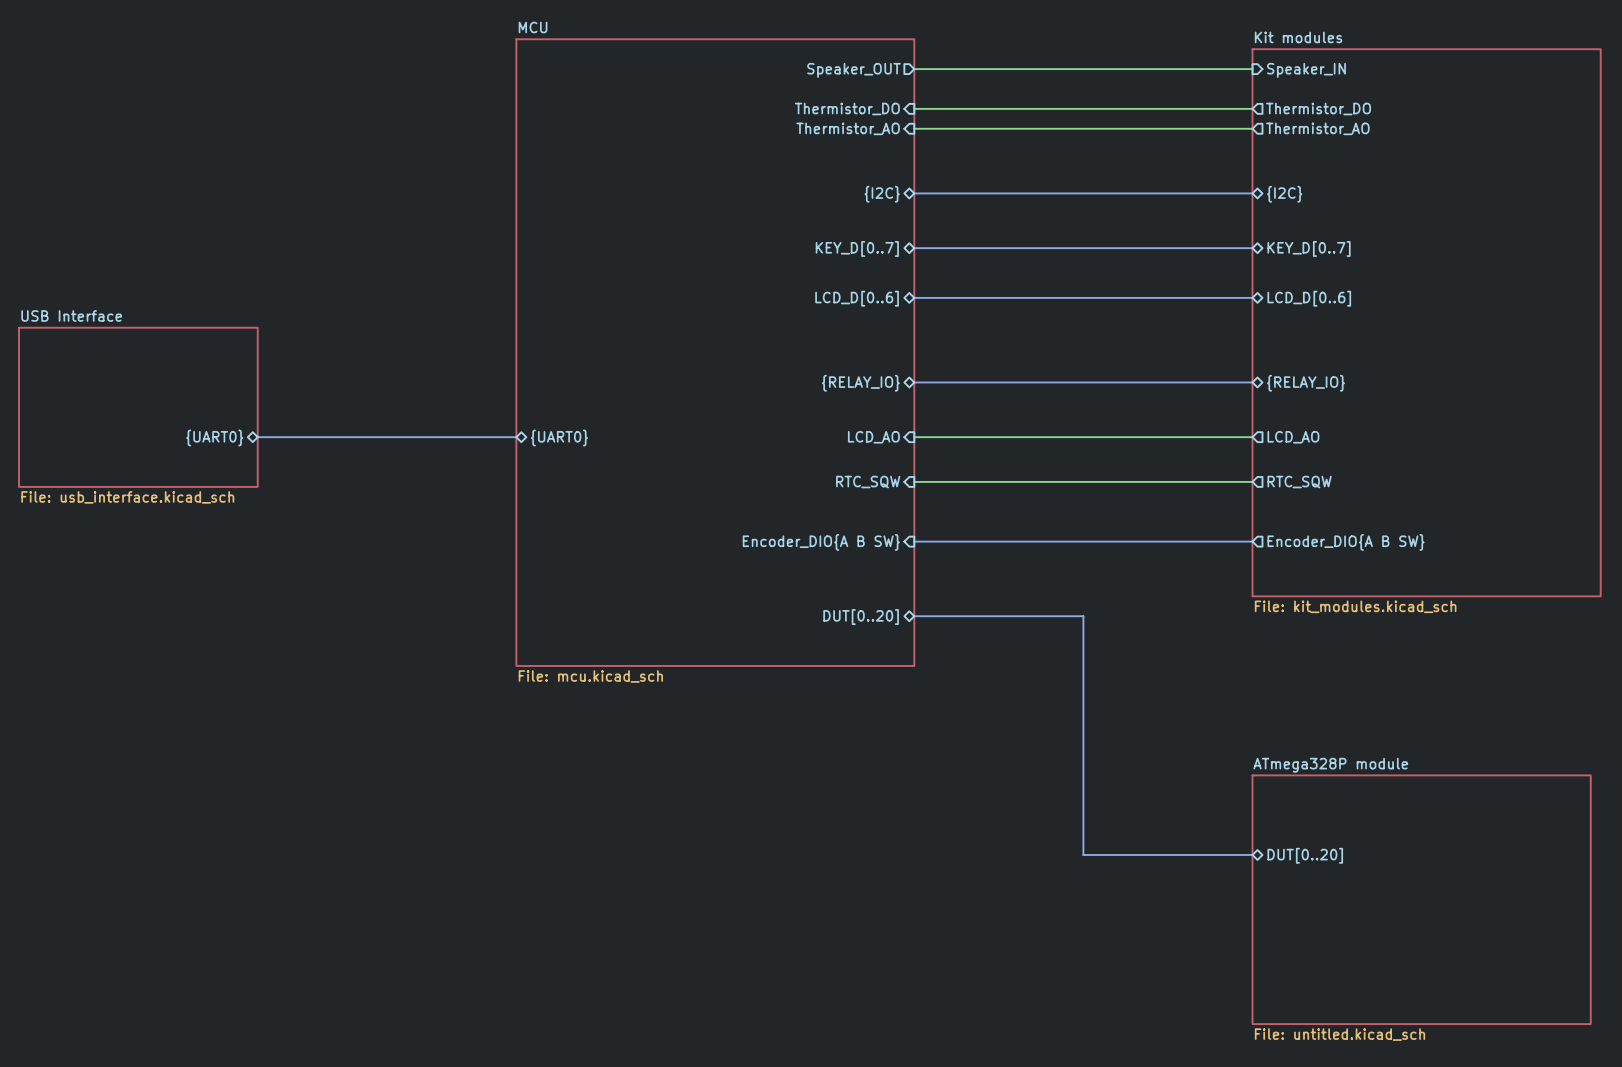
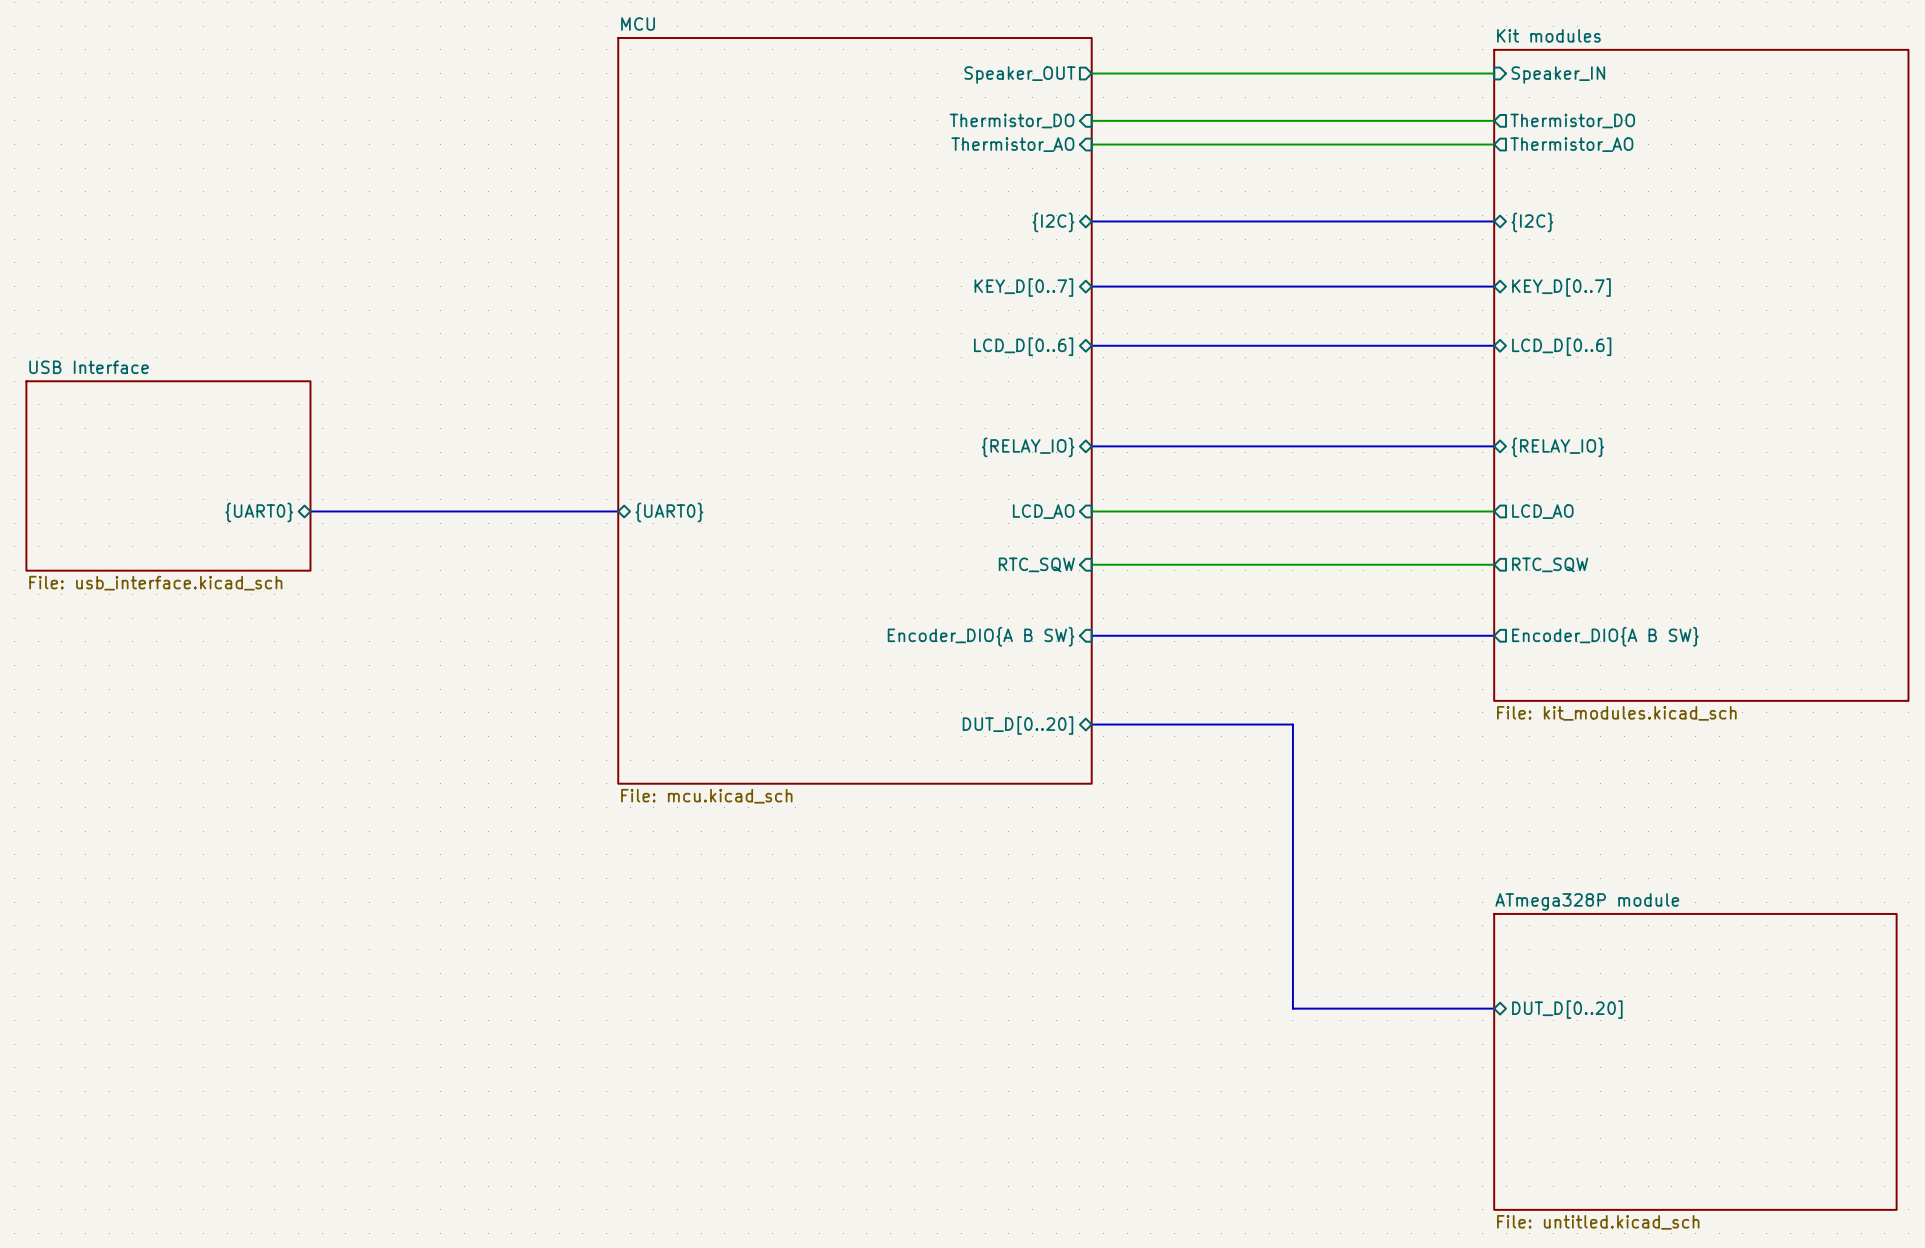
sheet pin: DUT[0..20] (861, 617) -> DUT_D[0..20] (1017, 725)
sheet pin: DUT[0..20] (1305, 855) -> DUT_D[0..20] (1567, 1009)

